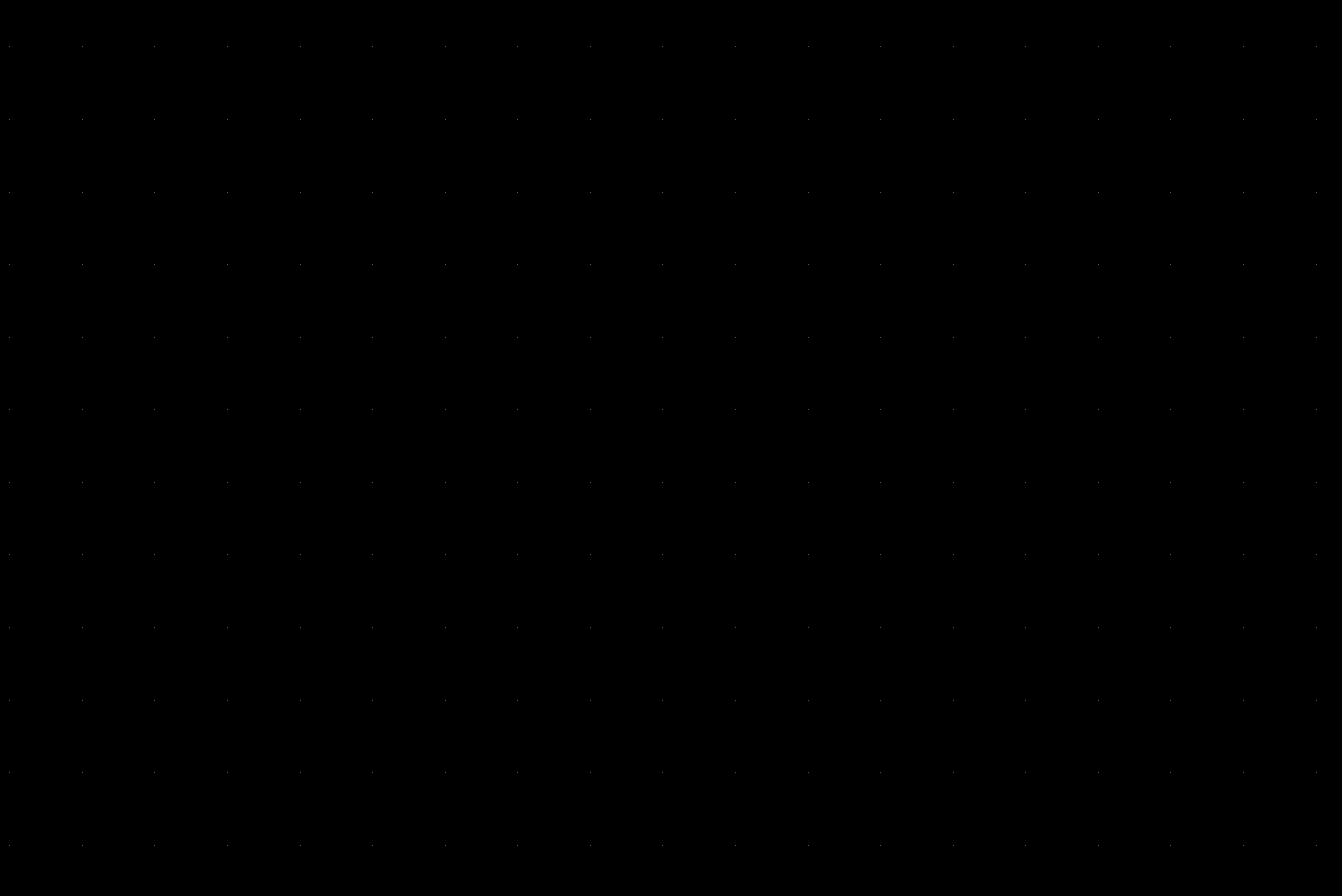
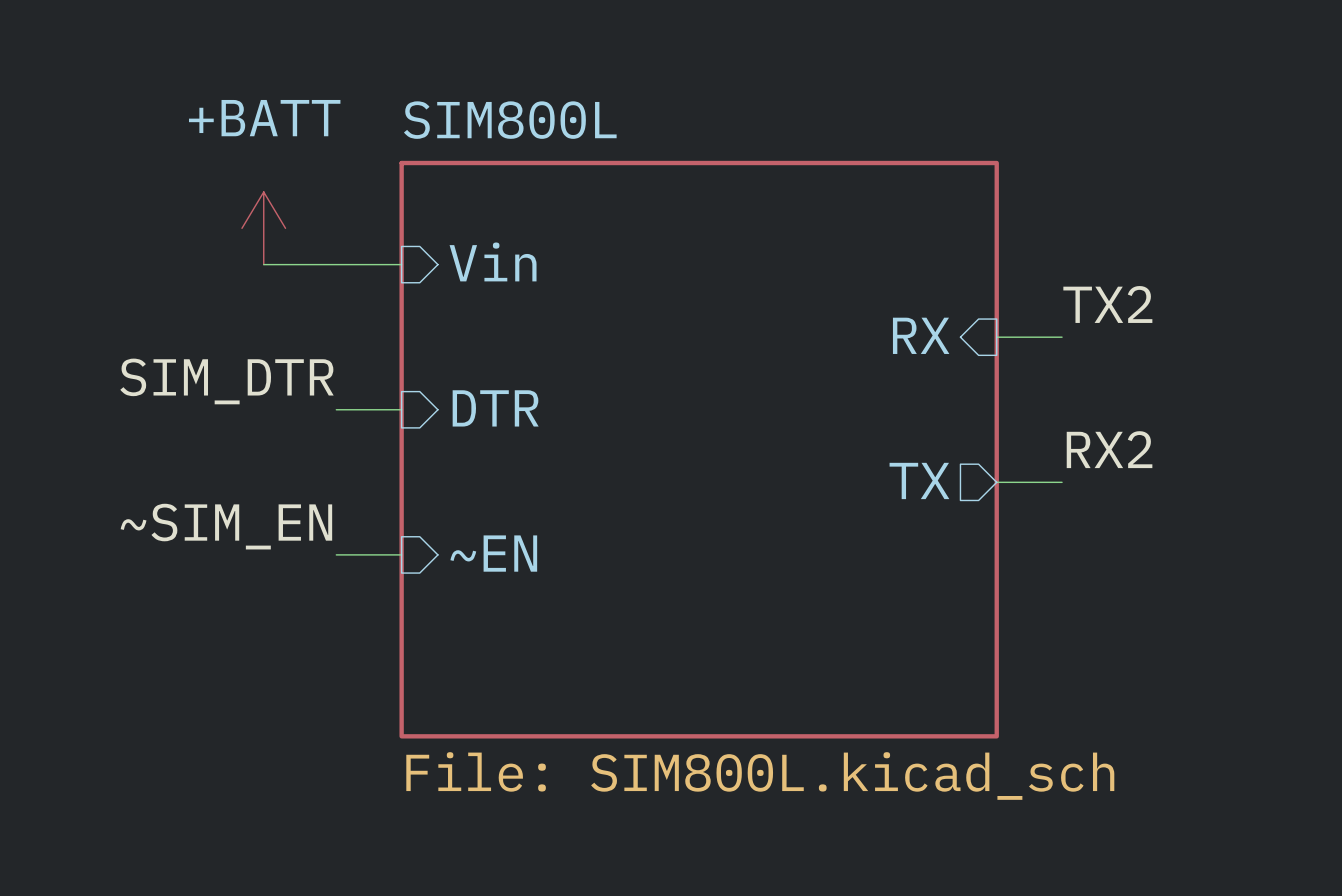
power symbol: none -> +BATT (263, 228)
sheet pin: none -> Vin (493, 261)
wire: none -> (263, 264) (401, 264)
label: none -> TX2 (1107, 304)
sheet pin: none -> RX (921, 335)
wire: none -> (996, 337) (1062, 337)
label: none -> SIM_DTR (226, 381)
sheet pin: none -> DTR (495, 408)
wire: none -> (336, 409) (401, 409)
sheet SIM800L: none -> File: SIM800L.kicad_sch (699, 449)
label: none -> RX2 (1109, 449)
sheet pin: none -> TX (919, 480)
wire: none -> (996, 482) (1062, 482)
label: none -> ~SIM_EN (226, 526)
sheet pin: none -> ~EN (493, 553)
wire: none -> (336, 554) (401, 554)

